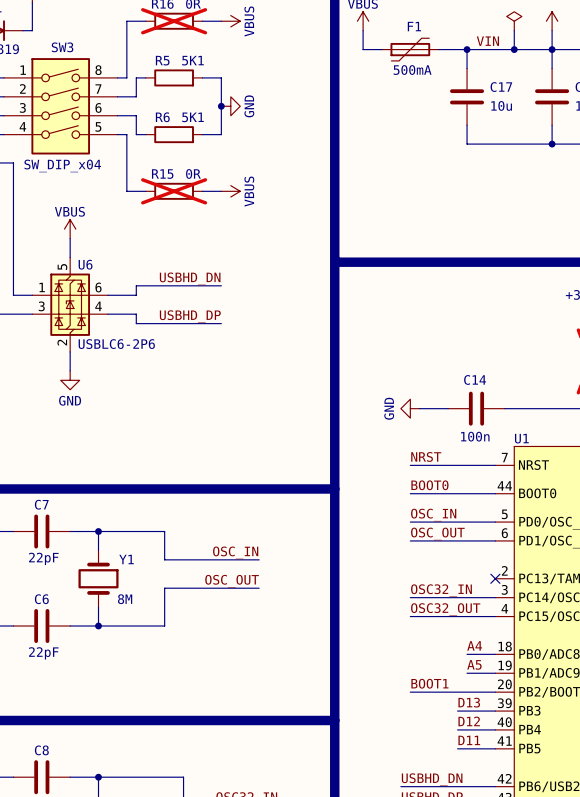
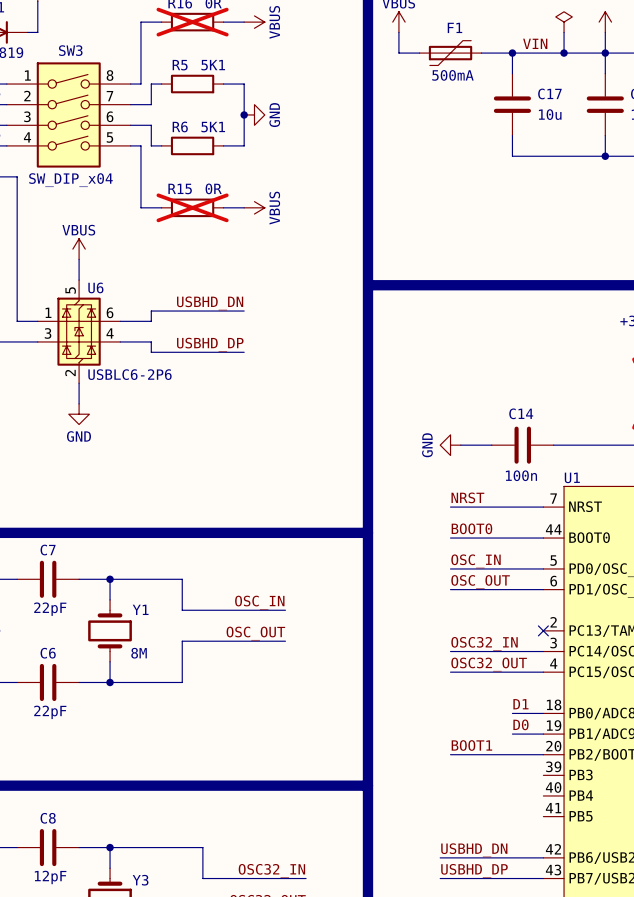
label: A4 (474, 645) -> D1 (520, 704)
label: A5 (474, 664) -> D0 (520, 724)
label: D13 (469, 702) -> none
wire: (457, 711) (495, 711) -> none
label: D12 (469, 721) -> none
wire: (457, 729) (495, 729) -> none
label: D11 (469, 740) -> none
wire: (457, 748) (495, 748) -> none

